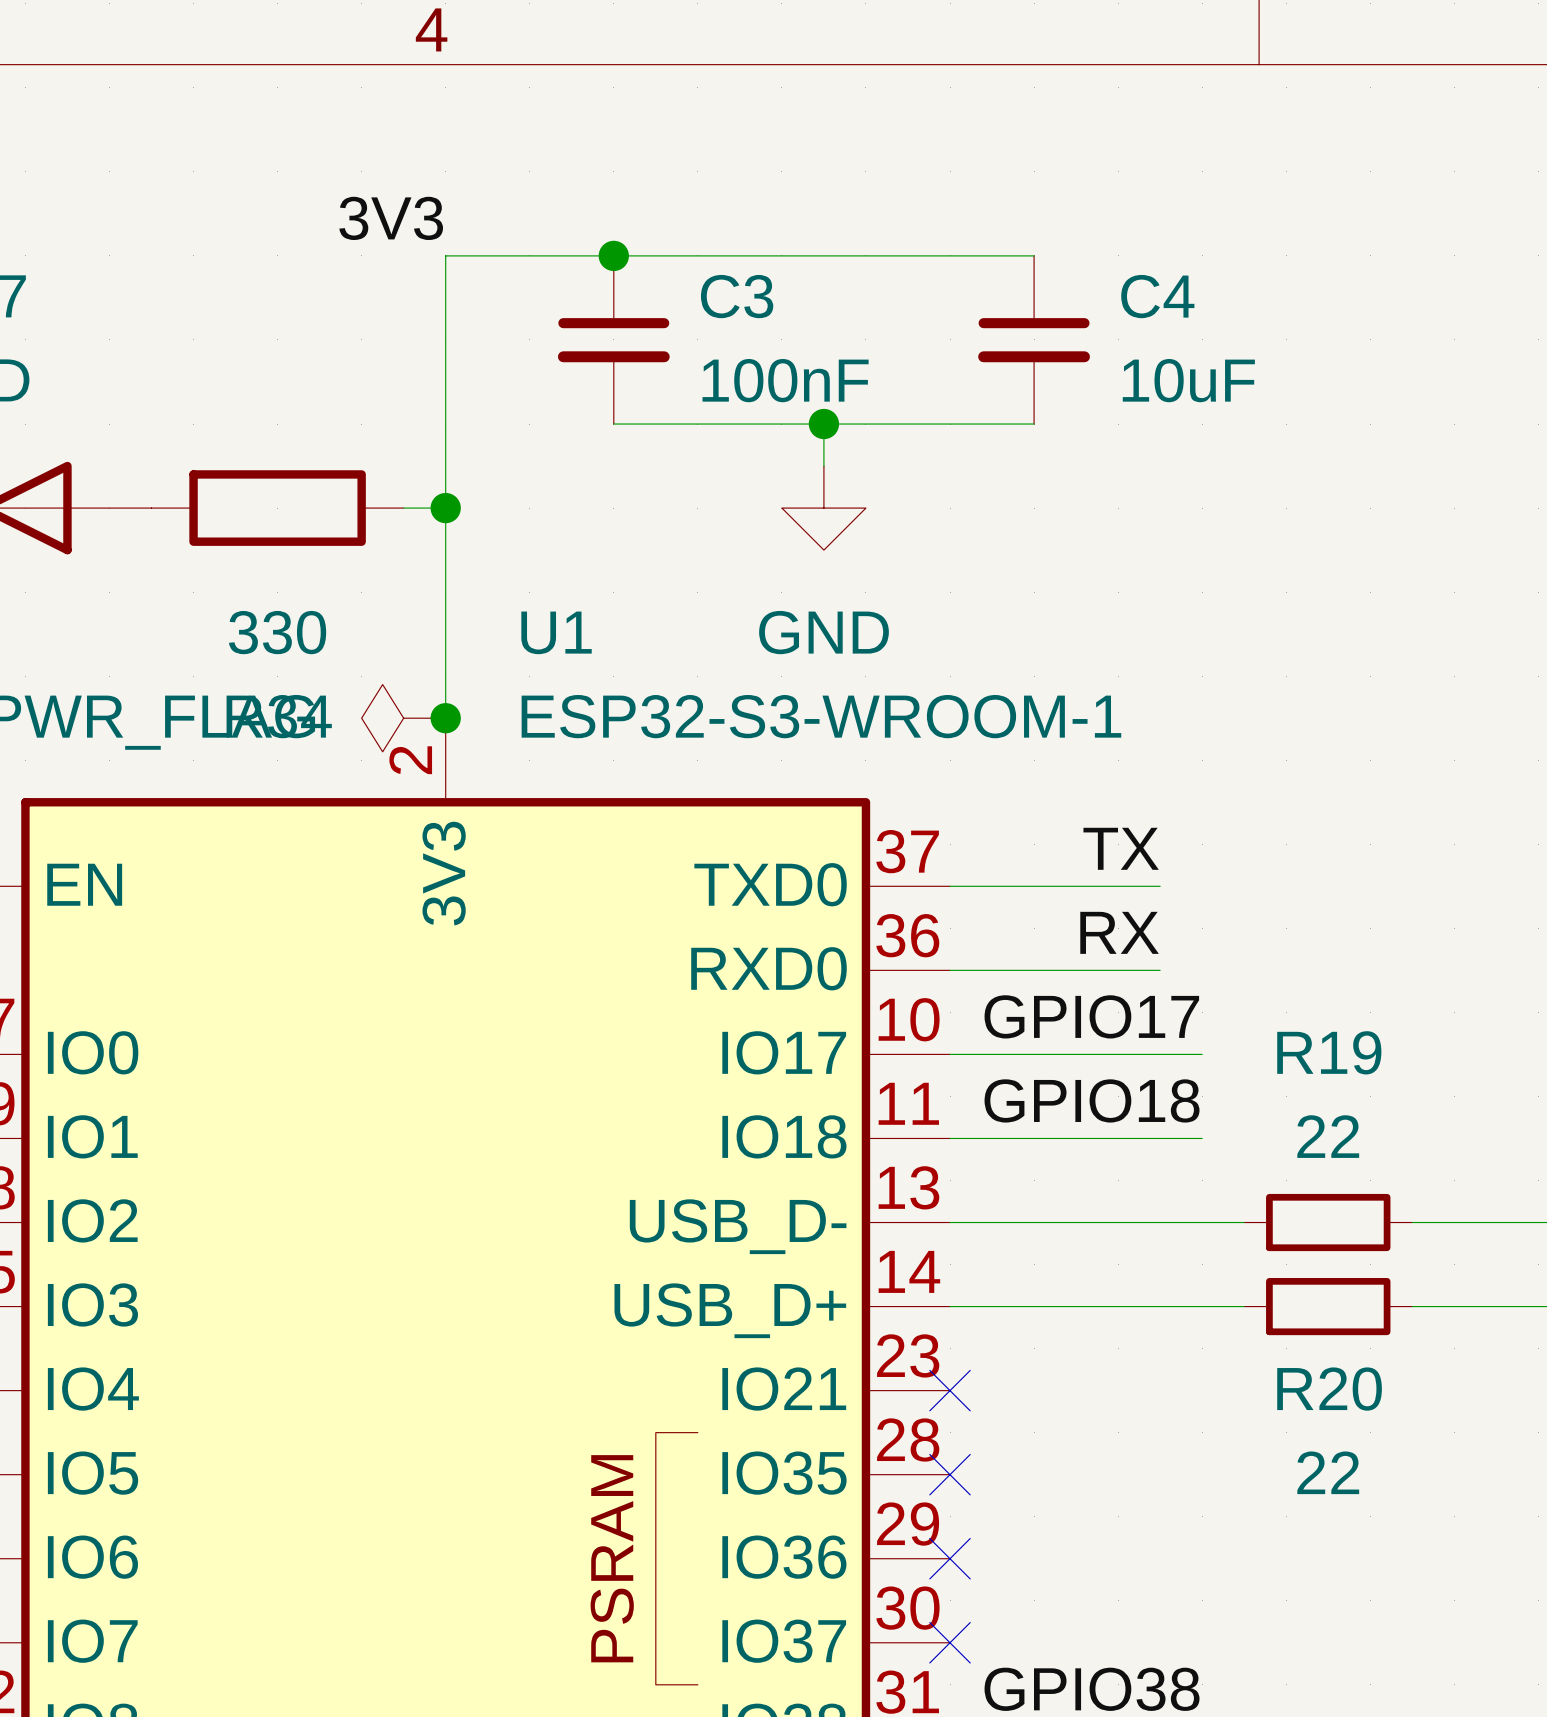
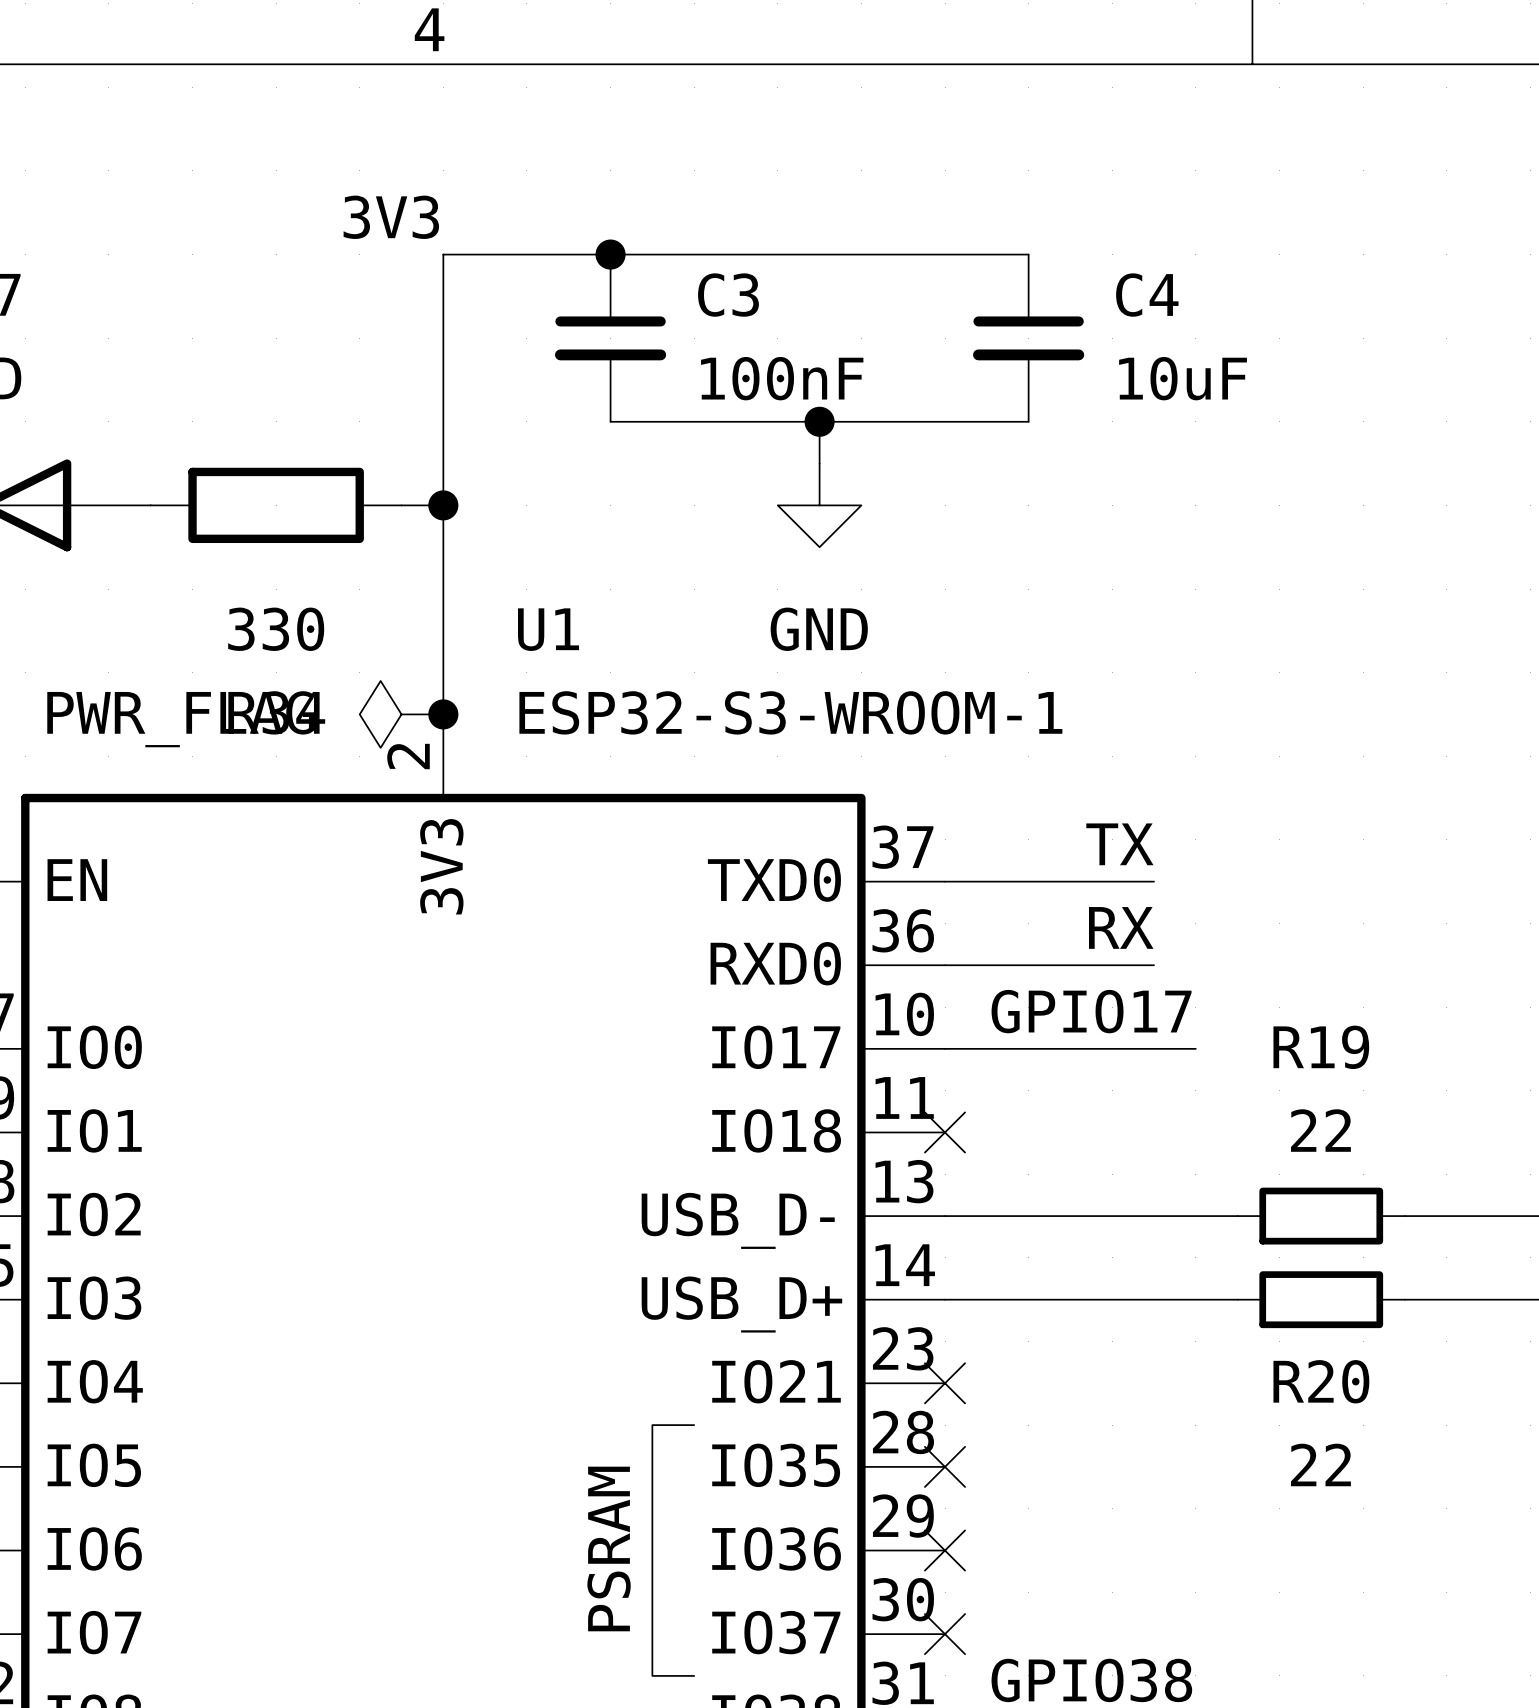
label: GPIO18 (1092, 1100) -> none
wire: (950, 1138) (1202, 1138) -> none
no-connect mark: none -> (945, 1132)

